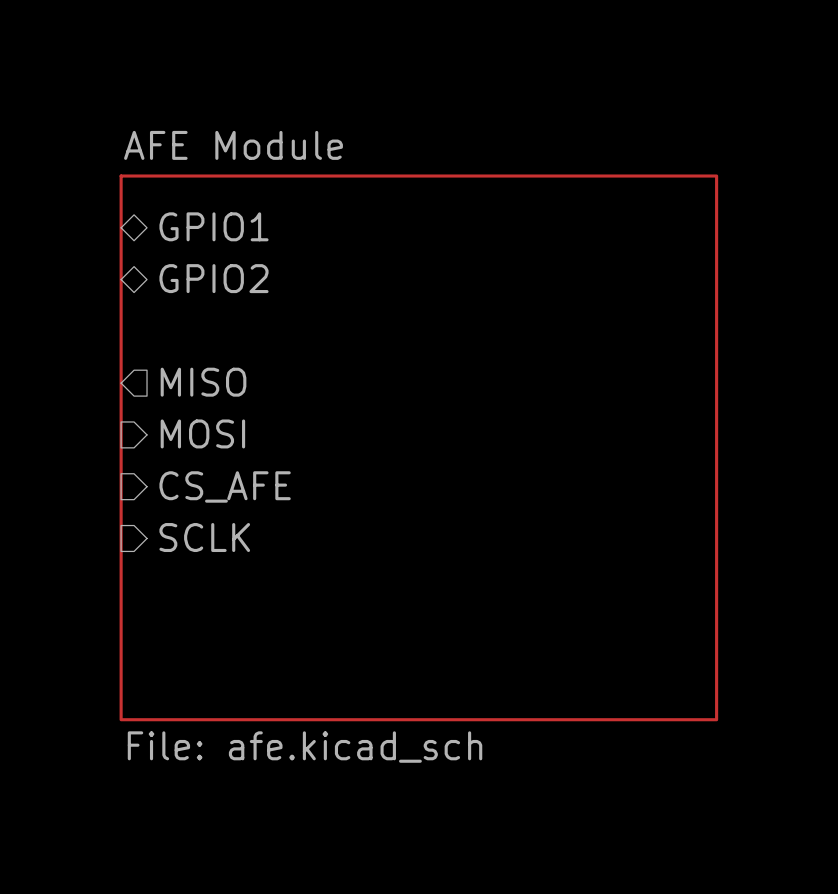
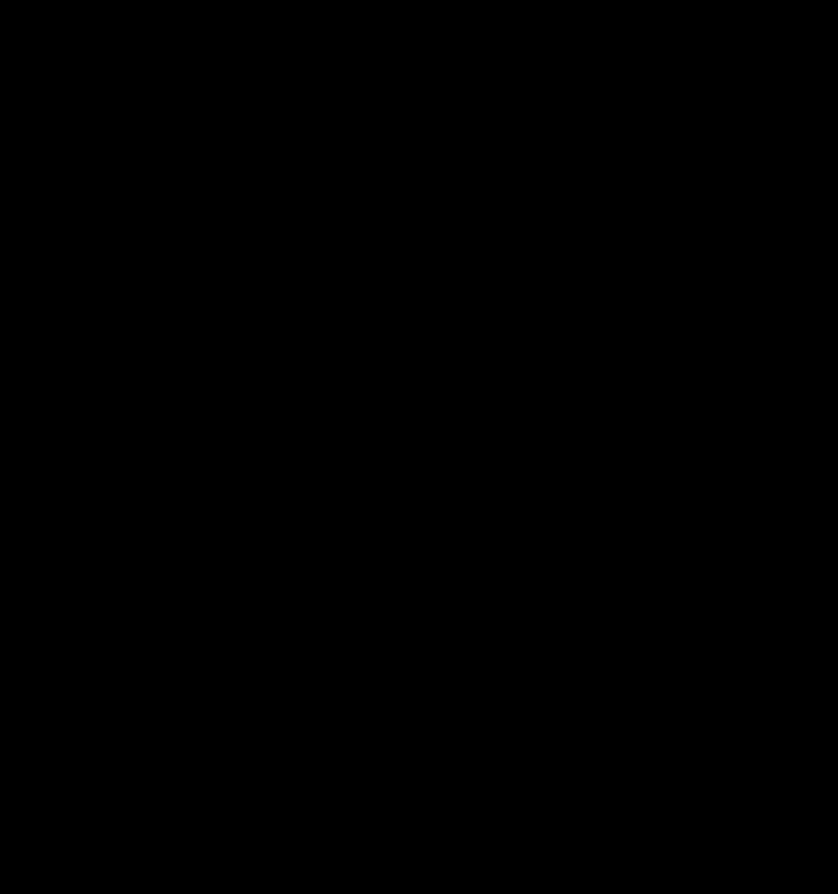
sheet pin: GPIO1 (213, 226) -> none
sheet pin: GPIO2 (213, 278) -> none
sheet pin: MISO (203, 382) -> none
sheet pin: MOSI (202, 433) -> none
sheet AFE Module: File: afe.kicad_sch (418, 447) -> none
sheet pin: CS_AFE (225, 486) -> none
sheet pin: SCLK (204, 537) -> none

